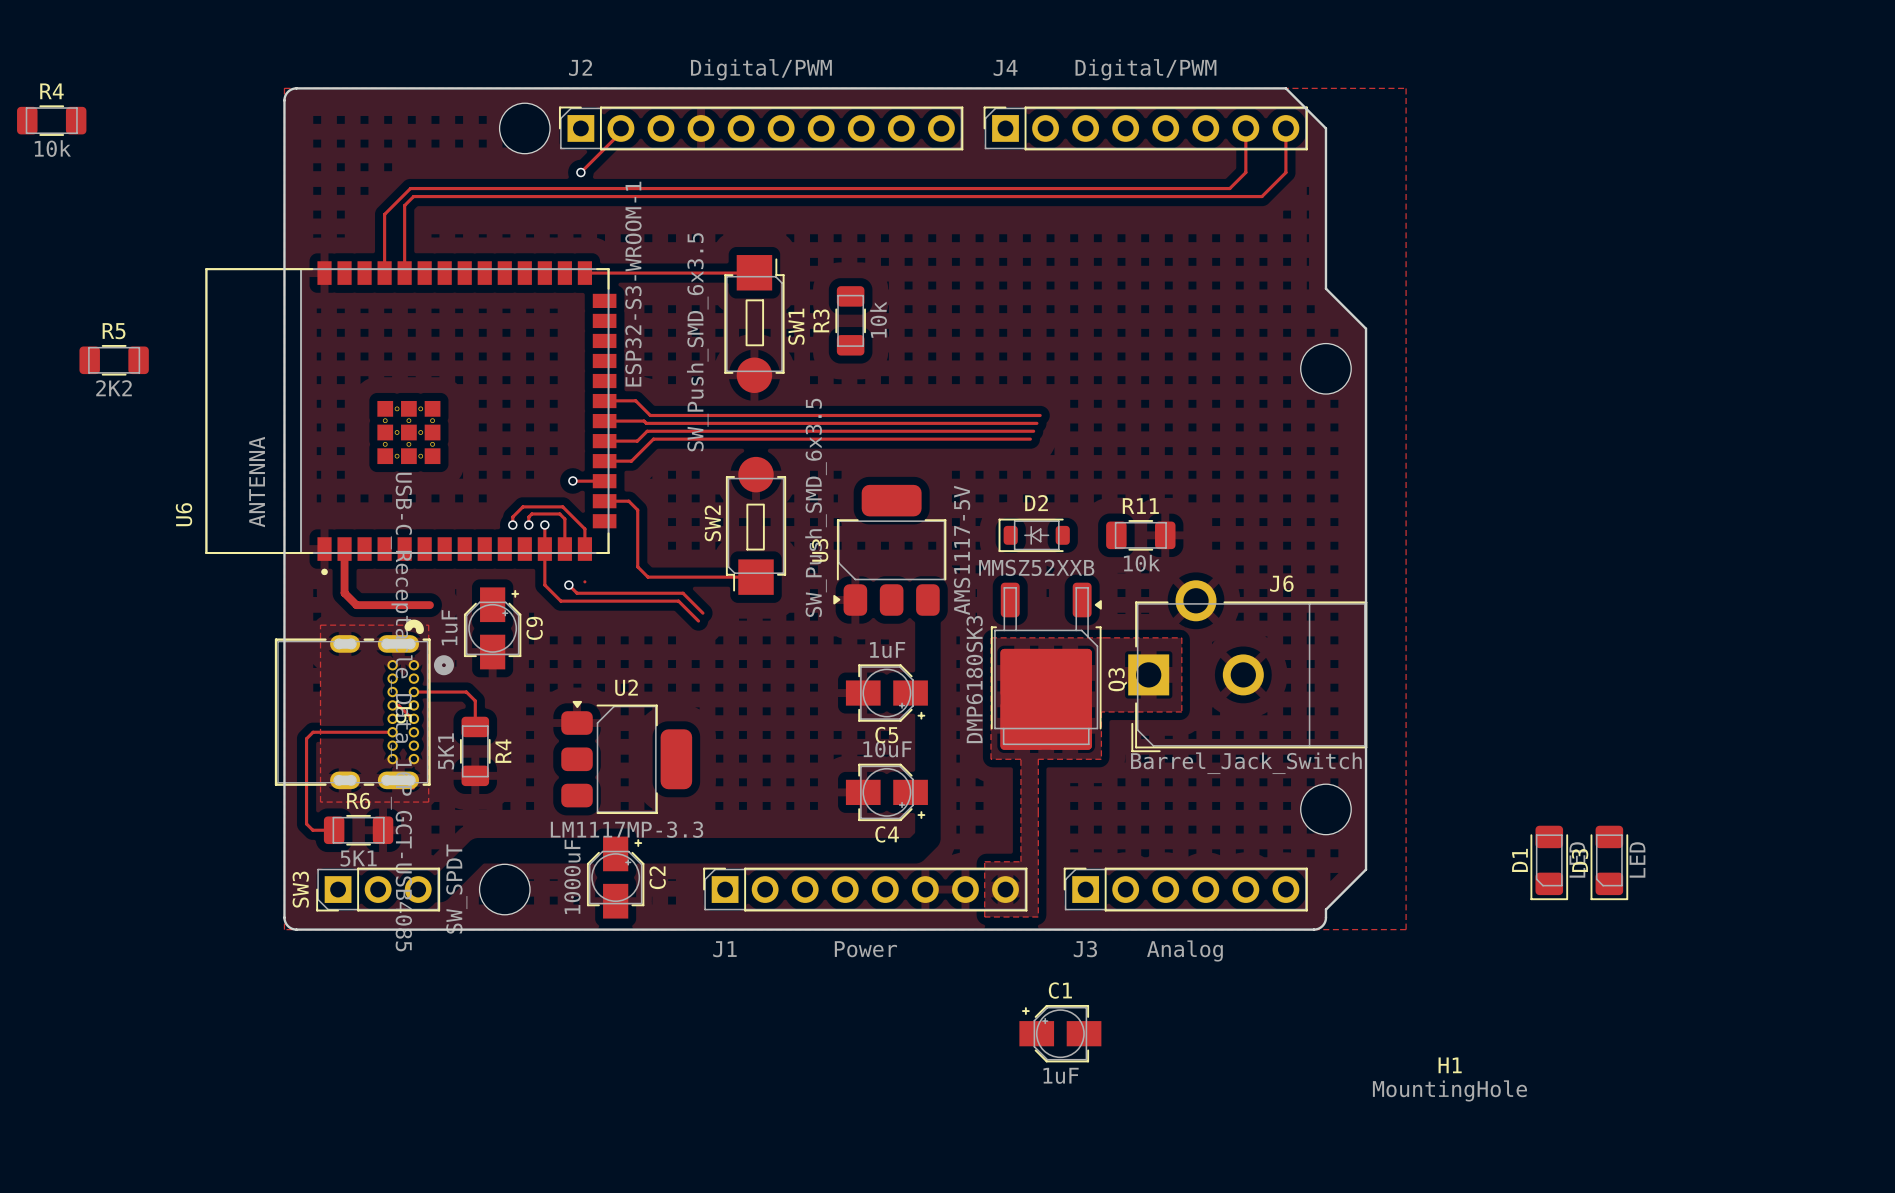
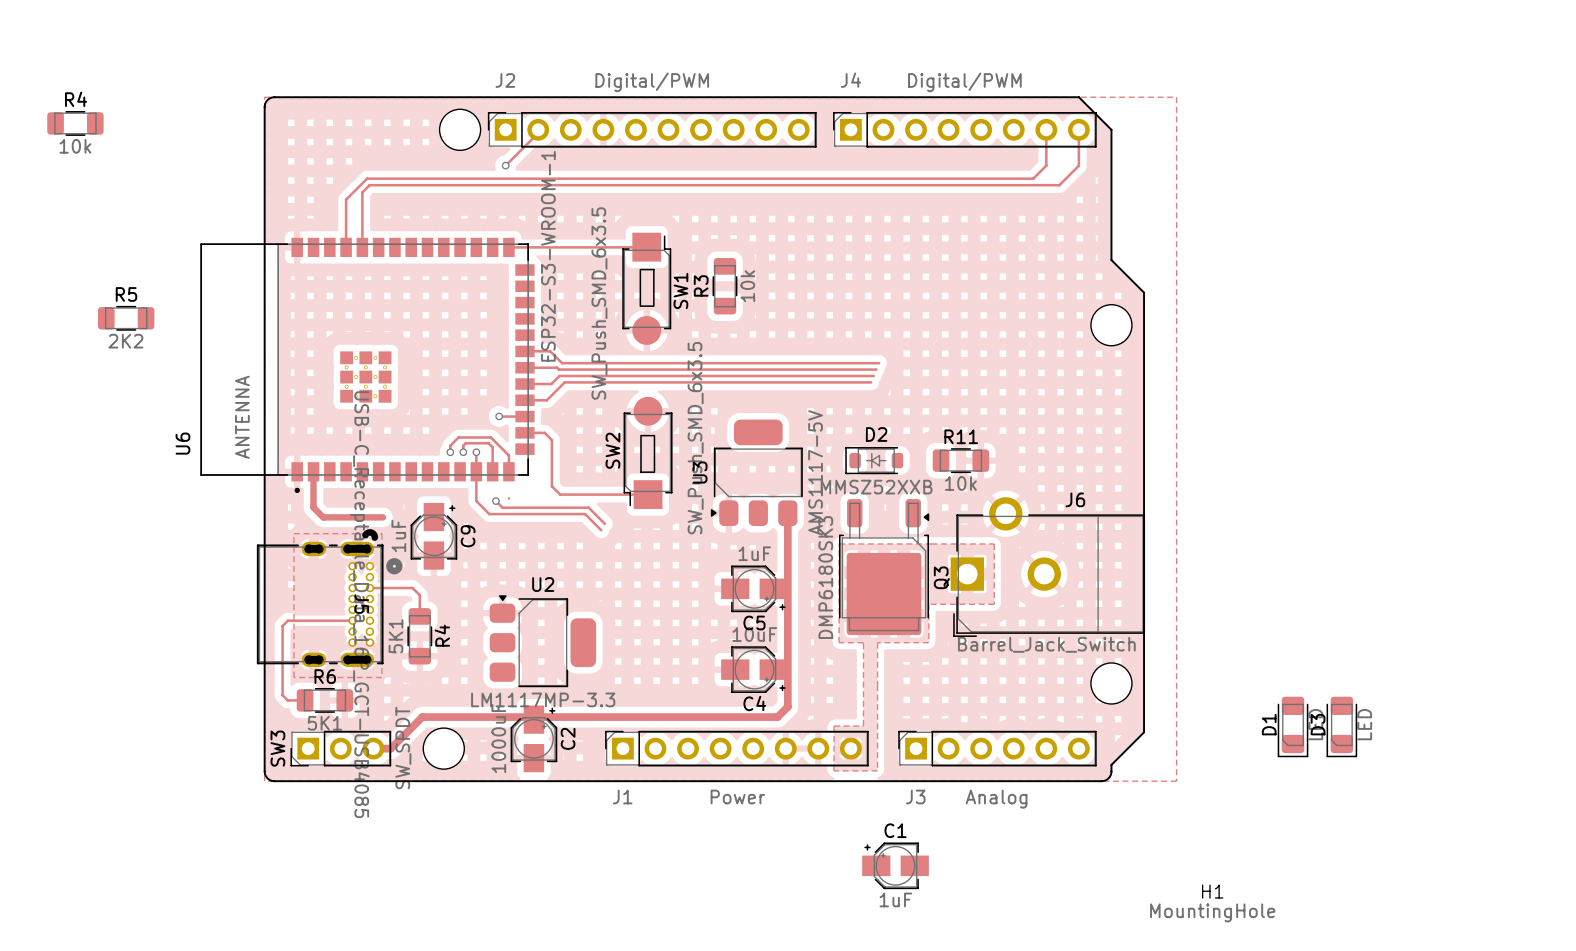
track: none -> (787, 513) (787, 706) (777, 717) (422, 717) (390, 748) (373, 748)

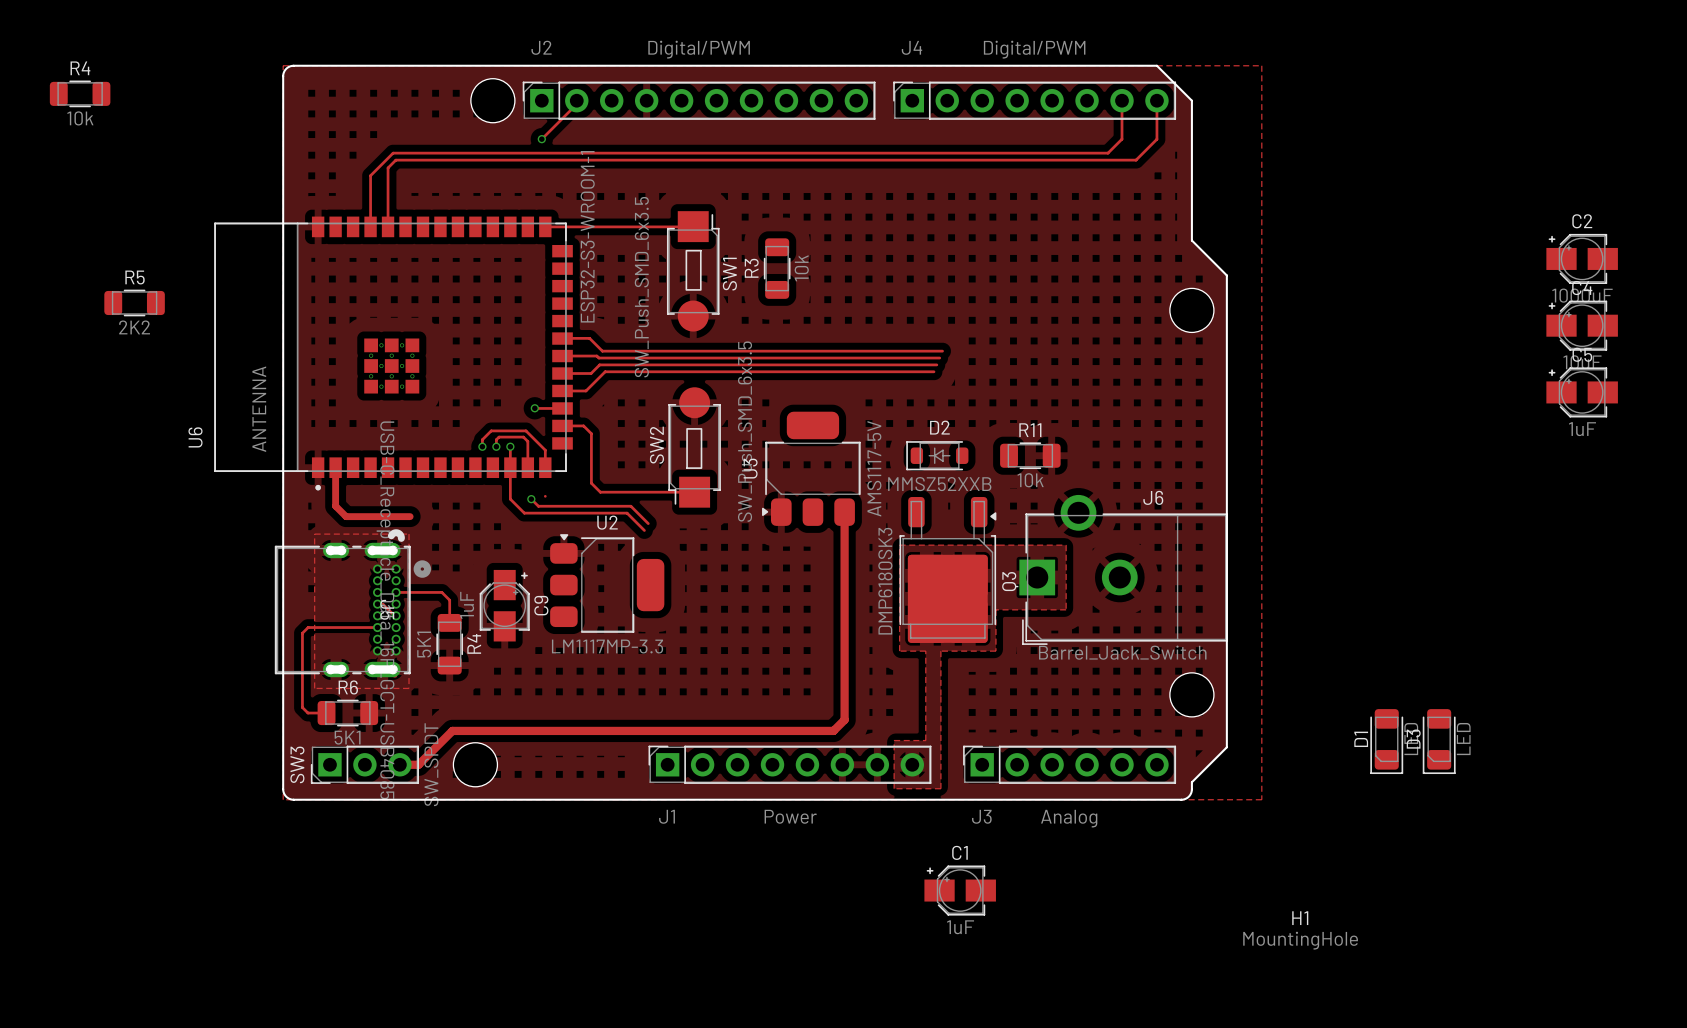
C9 position: (433, 536) -> (504, 605)
C5 rotation: 0° (754, 588) -> 180° (1582, 392)
C5 position: (754, 588) -> (1582, 392)
U2 position: (542, 641) -> (607, 583)
C4 rotation: 0° (754, 669) -> 180° (1582, 325)
C4 position: (754, 669) -> (1582, 325)
C2 rotation: 0° (533, 738) -> 90° counterclockwise (1582, 258)
C2 position: (533, 738) -> (1582, 258)

